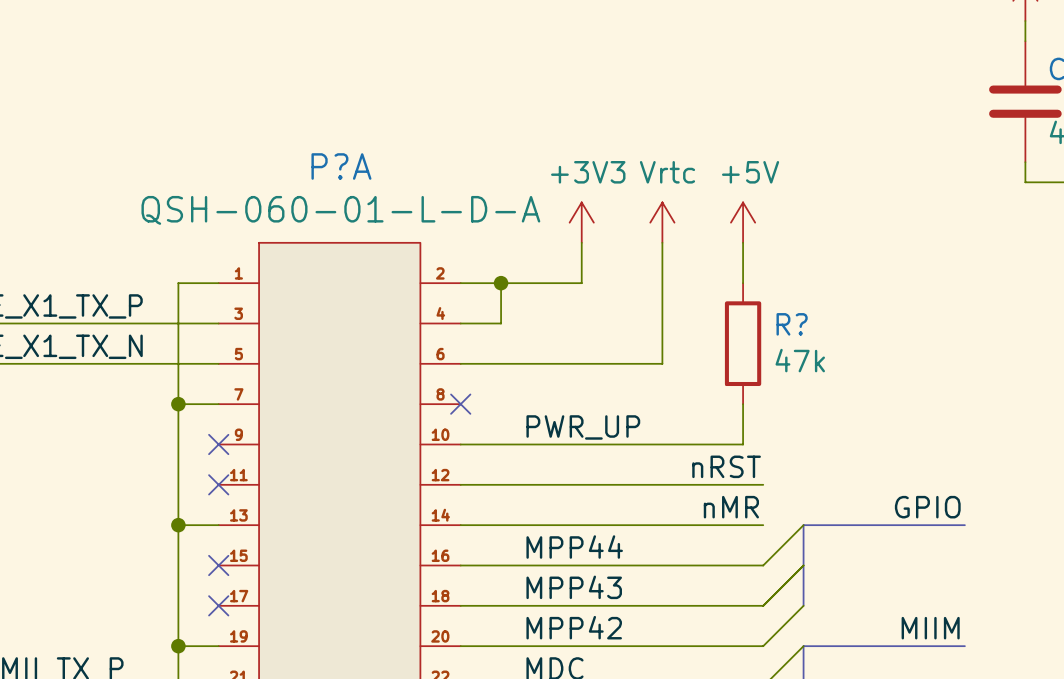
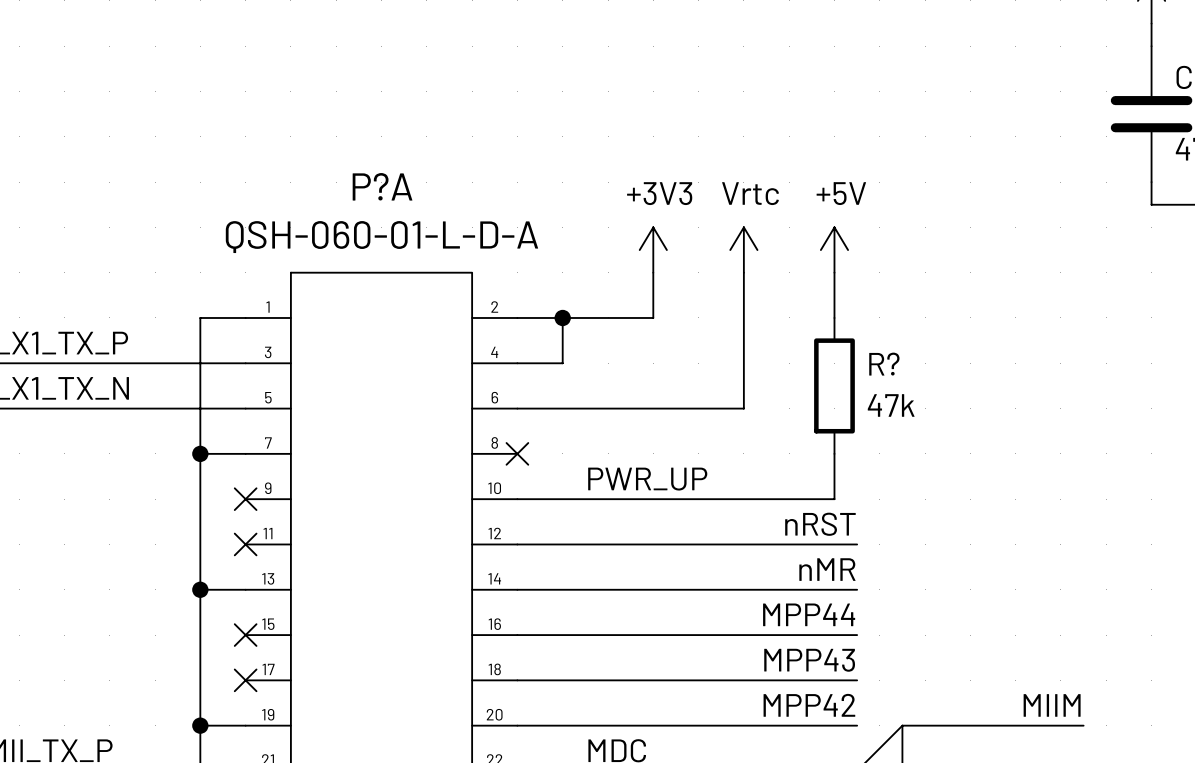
label: GPIO (927, 507) -> none
wire: (803, 525) (763, 565) -> none
bus: (964, 525) (803, 525) (803, 605) -> none
label position: MPP44 (574, 547) -> MPP44 (809, 614)
wire: (803, 565) (763, 605) -> none
label position: MPP43 (574, 587) -> MPP43 (809, 660)
wire: (803, 605) (763, 646) -> none
label position: MPP42 (574, 627) -> MPP42 (809, 705)

